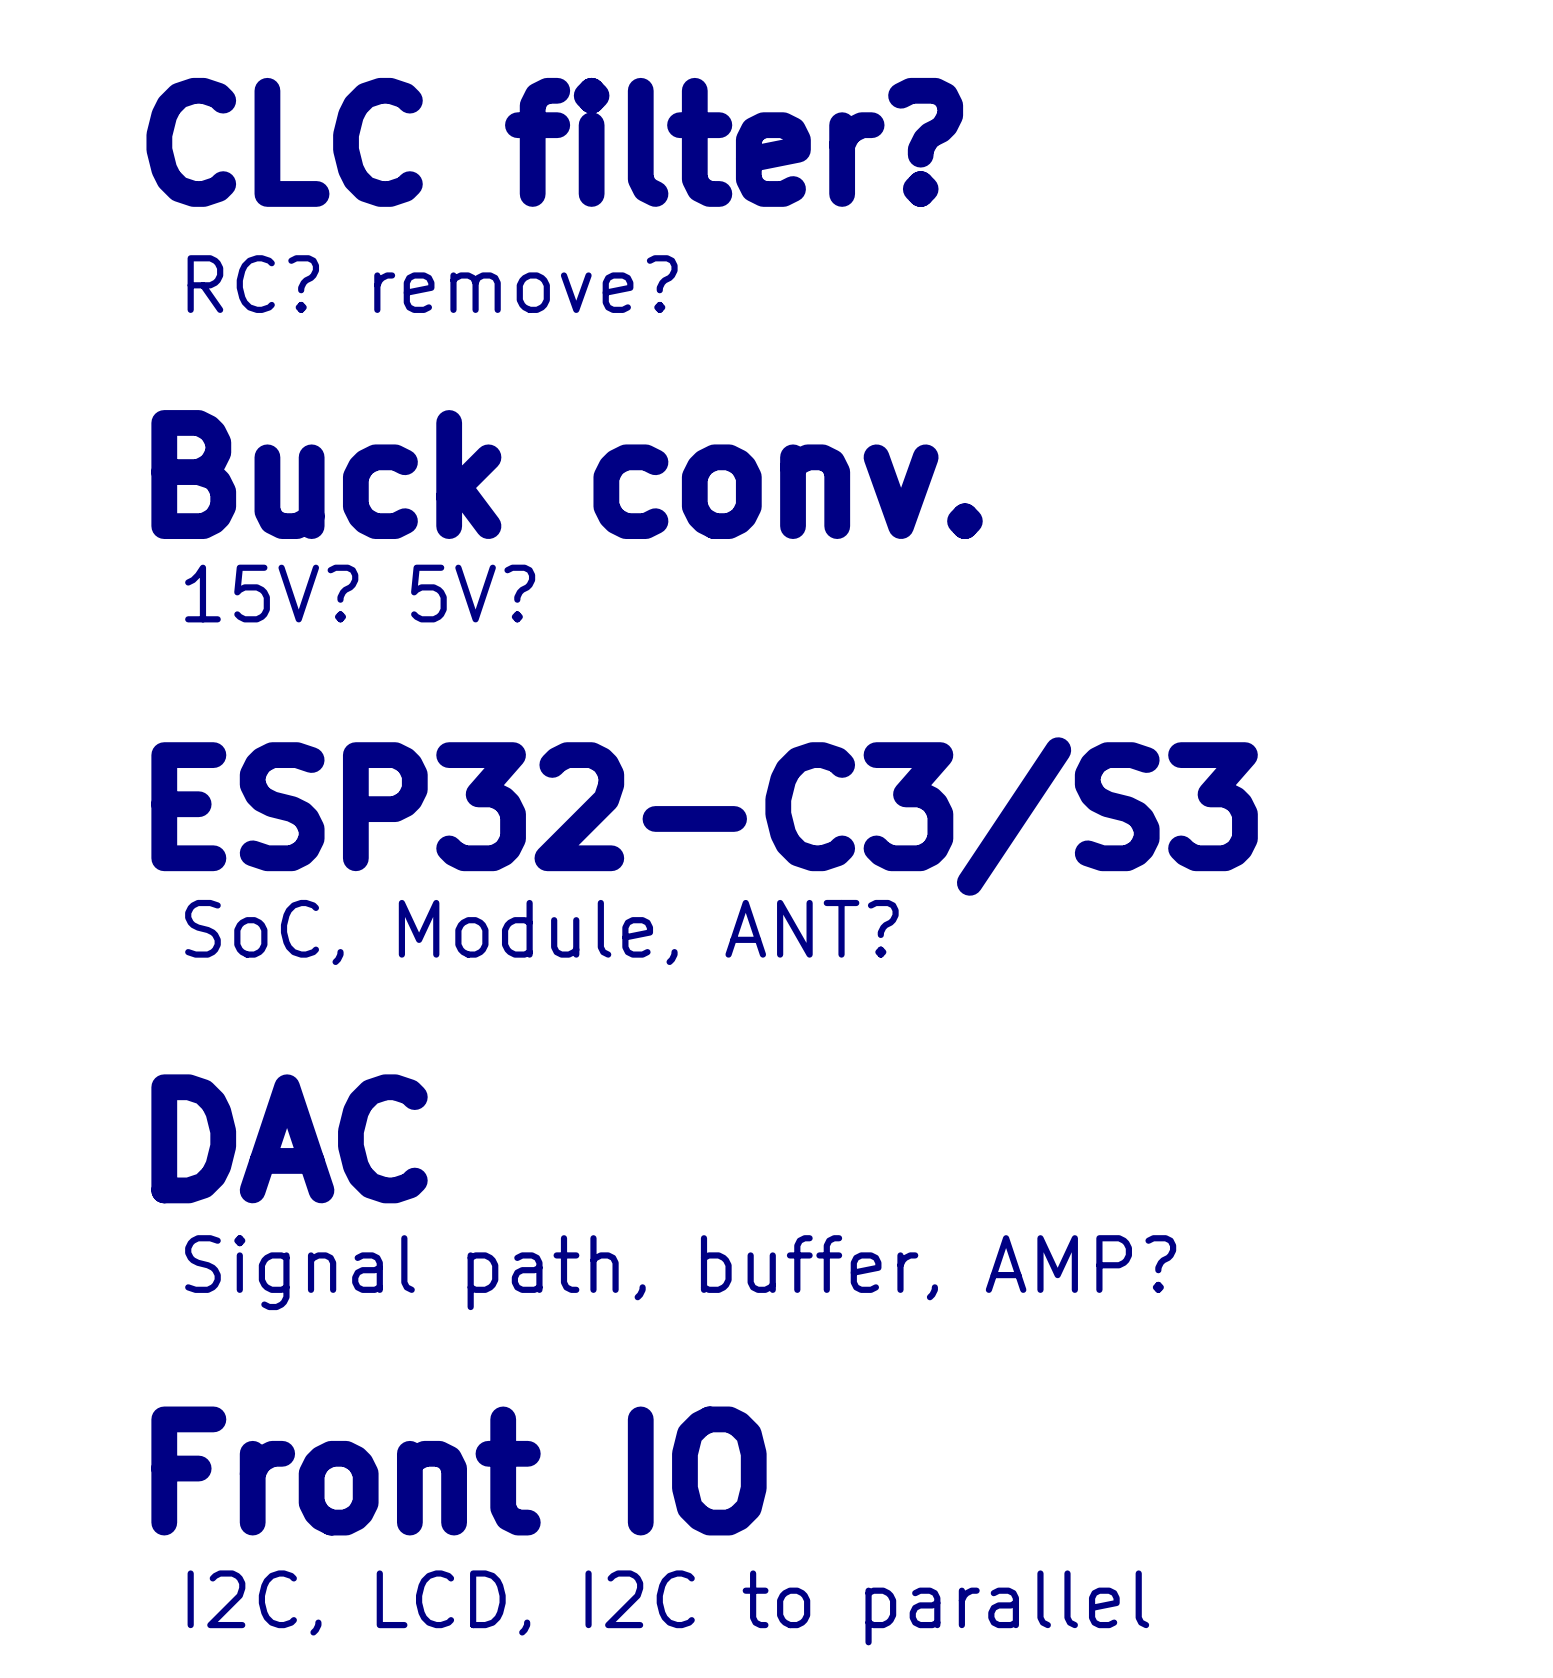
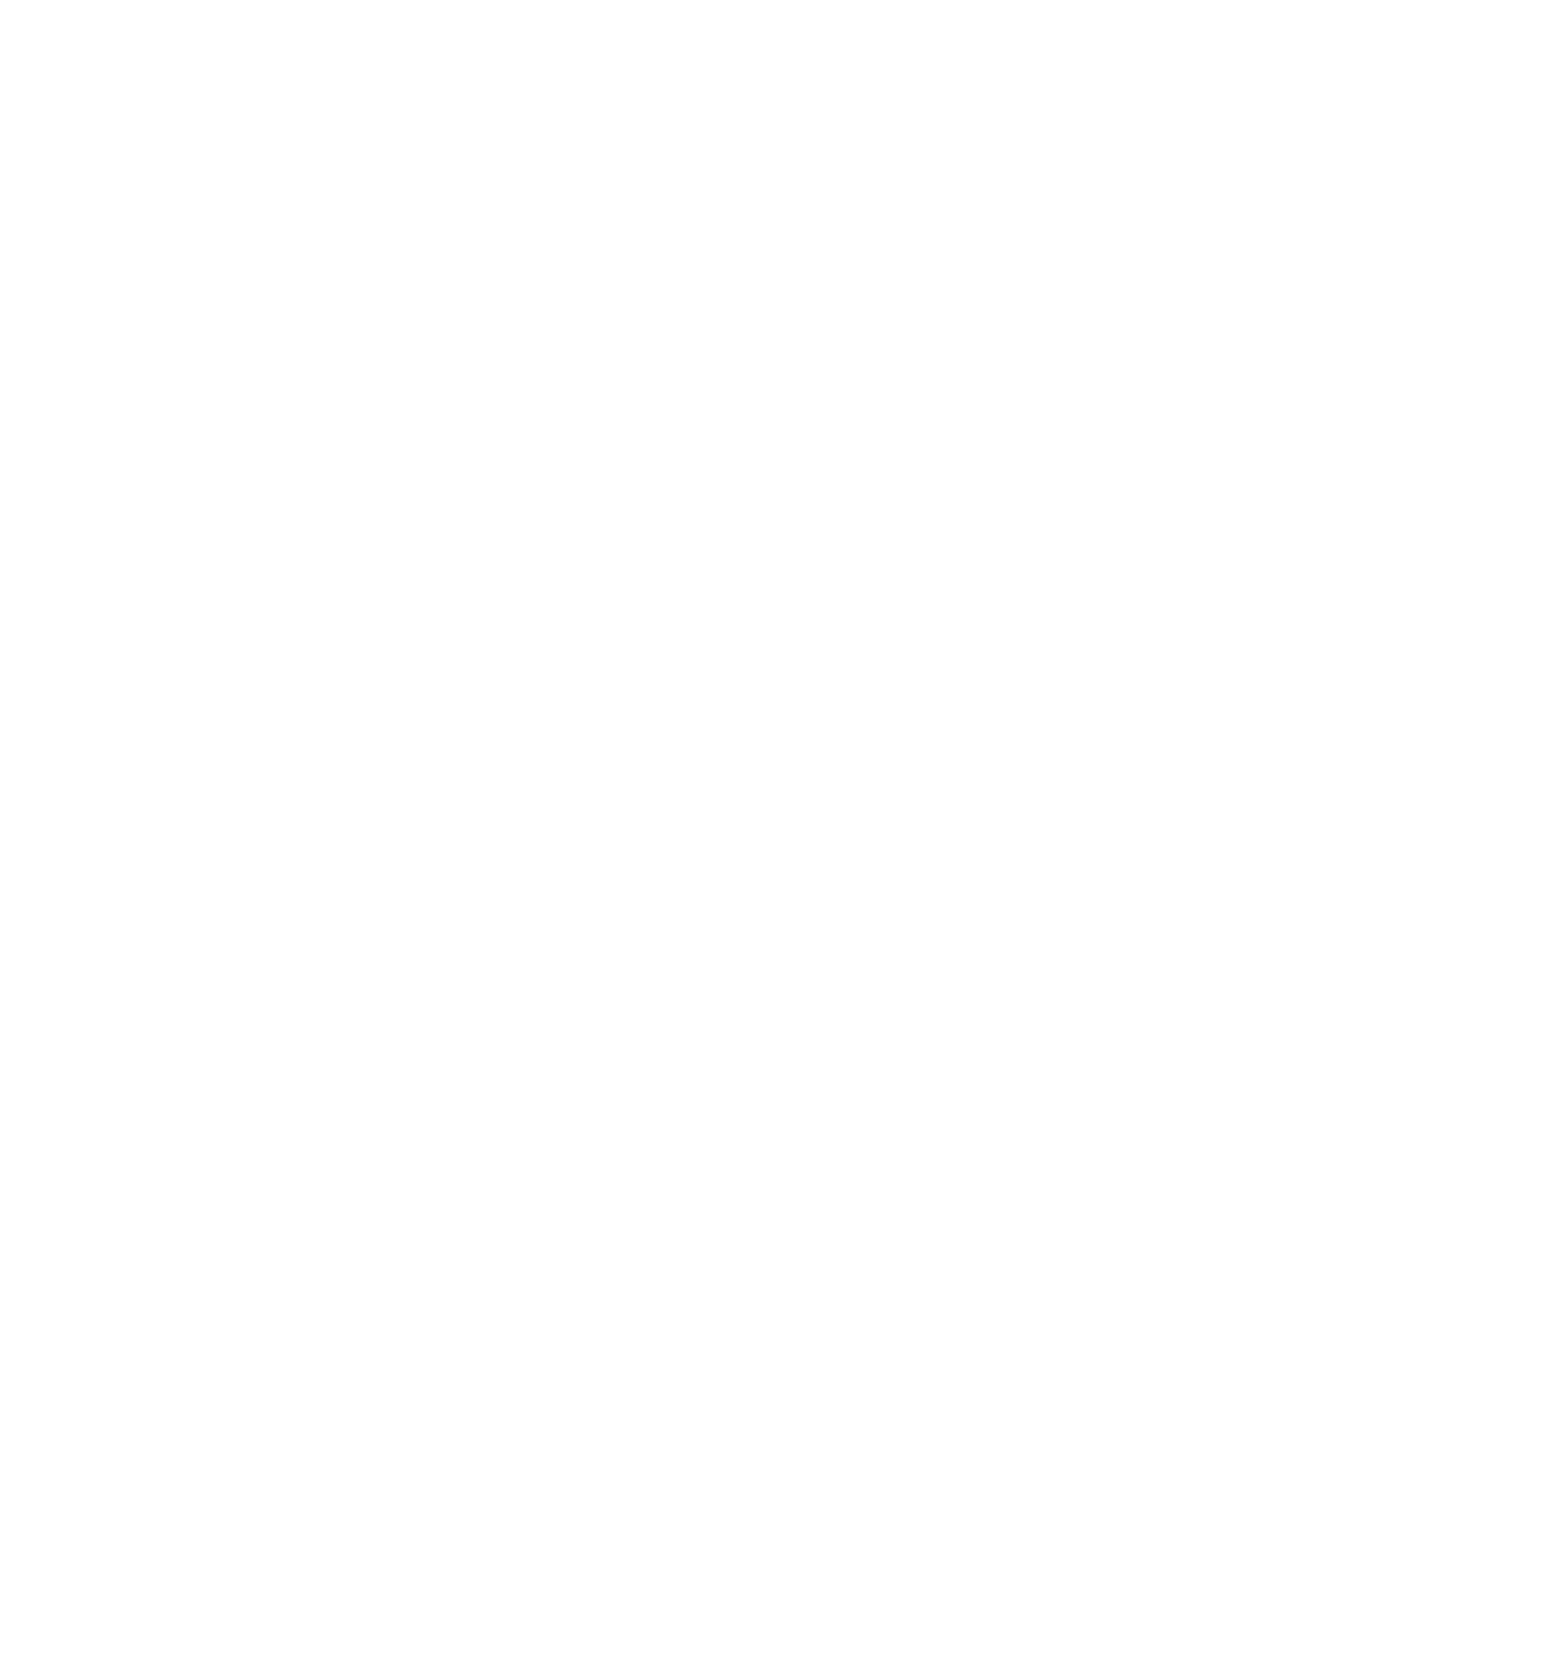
text: CLC filter? (554, 142) -> none
text: RC? remove? (432, 284) -> none
text: Buck conv. (567, 474) -> none
text: 15V? 5V? (360, 593) -> none
text: ESP32-C3/S3 (704, 816) -> none
text: SoC, Module, ANT? (541, 932) -> none
text: DAC (289, 1138) -> none
text: Signal path, buffer, AMP? (680, 1272) -> none
text: Front IO (459, 1470) -> none
text: I2C, LCD, I2C to parallel (668, 1607) -> none

